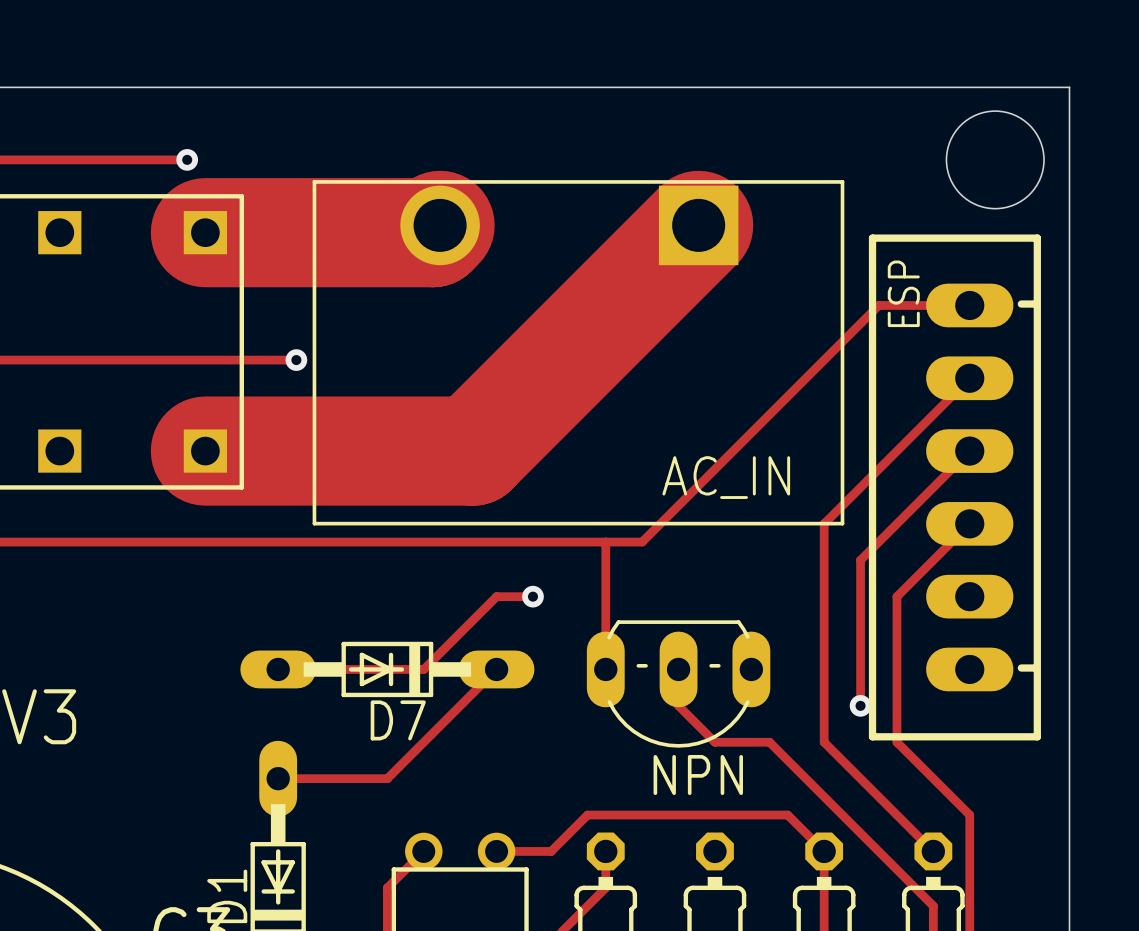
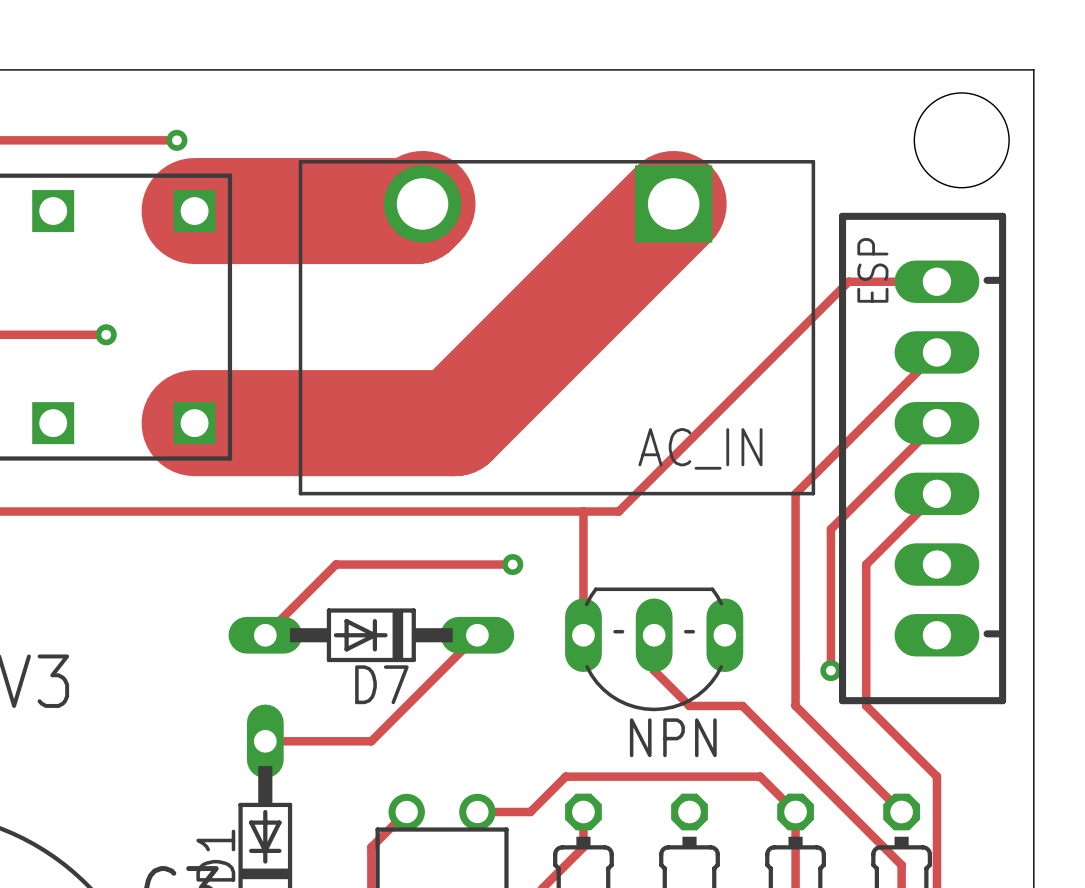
track: (114, 360) (296, 360) -> none
via: none -> (106, 334)
via: (296, 360) -> none
track: (496, 596) (423, 669) (278, 669) -> (477, 564) (336, 564) (265, 635)

